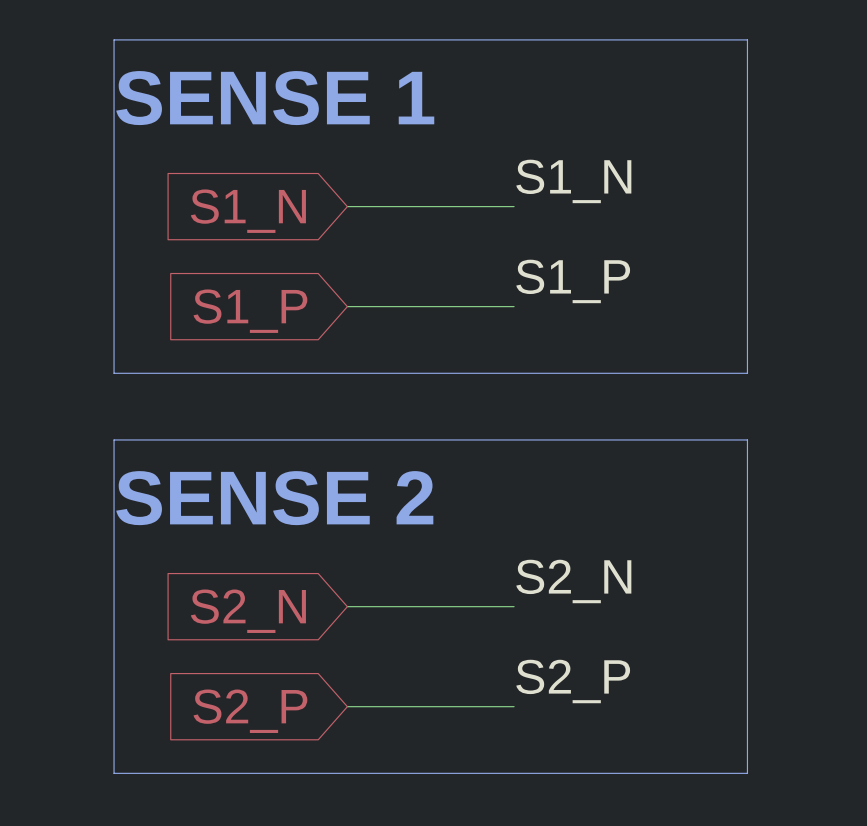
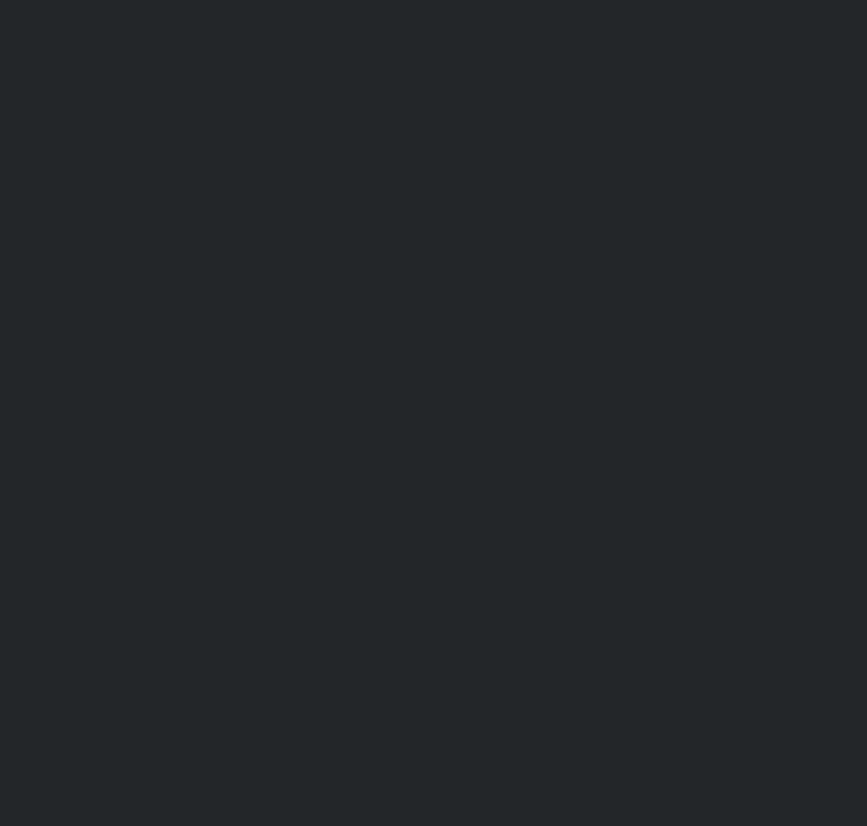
line: (114, 39) (114, 373) (747, 373) (747, 39) (114, 39) -> none
text: SENSE 1 (275, 98) -> none
label: S1_N (573, 181) -> none
wire: (347, 206) (514, 206) -> none
global label: S1_N (248, 211) -> none
label: S1_P (573, 281) -> none
wire: (347, 306) (514, 306) -> none
global label: S1_P (250, 311) -> none
line: (114, 439) (114, 773) (747, 773) (747, 439) (114, 439) -> none
text: SENSE 2 (274, 498) -> none
label: S2_N (573, 581) -> none
wire: (347, 606) (514, 606) -> none
global label: S2_N (248, 611) -> none
label: S2_P (573, 681) -> none
wire: (347, 706) (514, 706) -> none
global label: S2_P (250, 711) -> none

